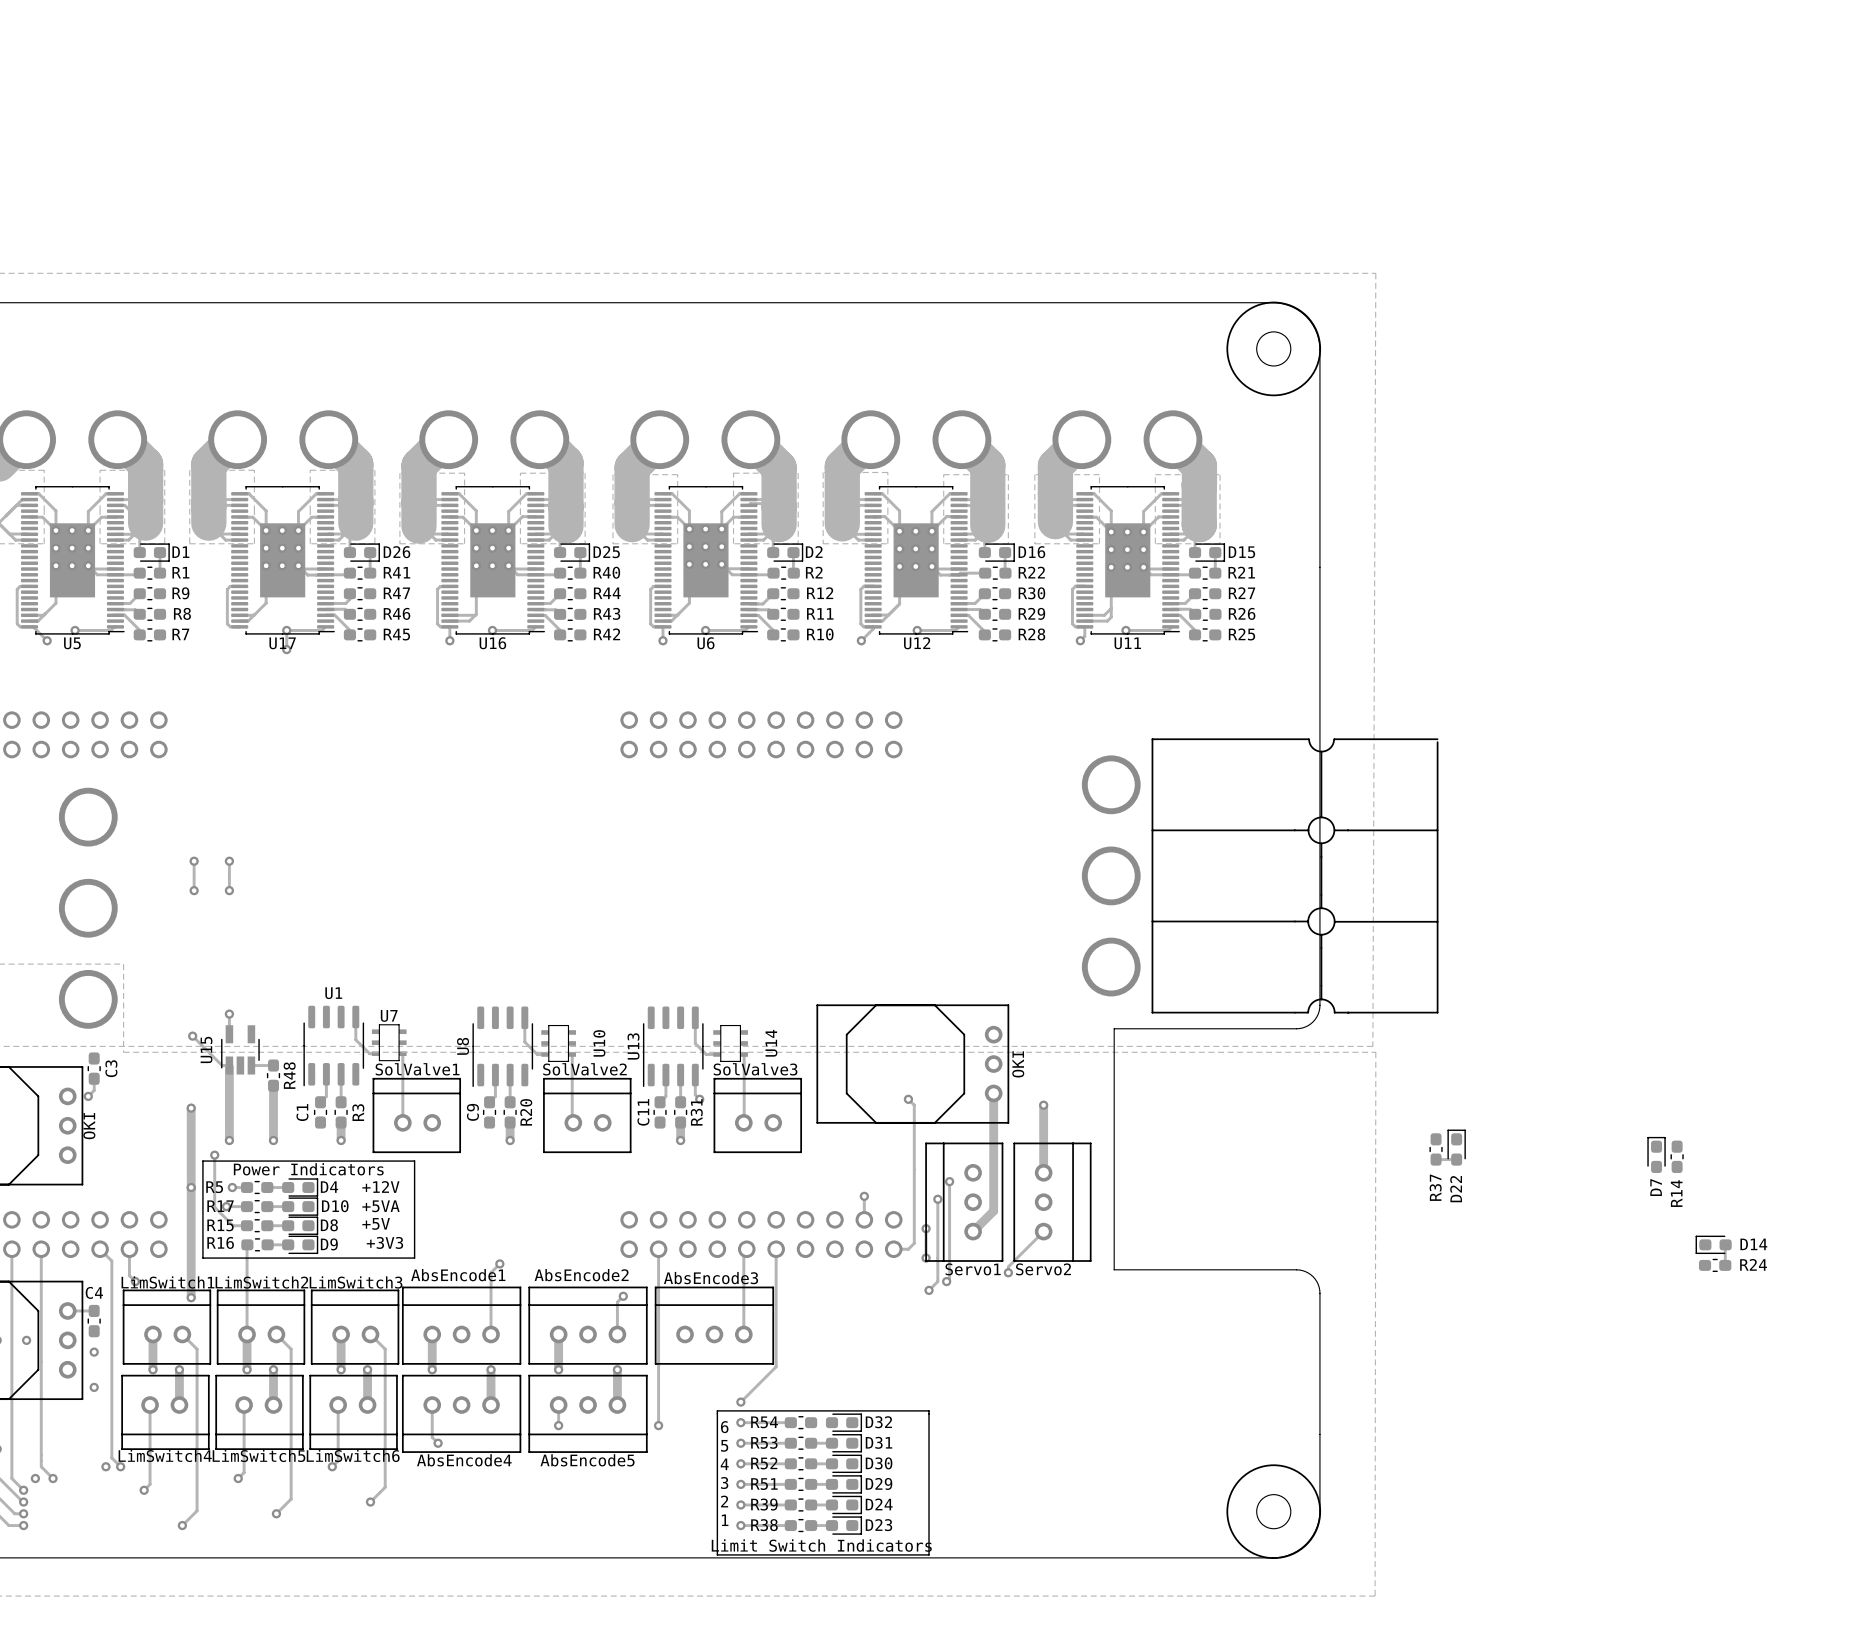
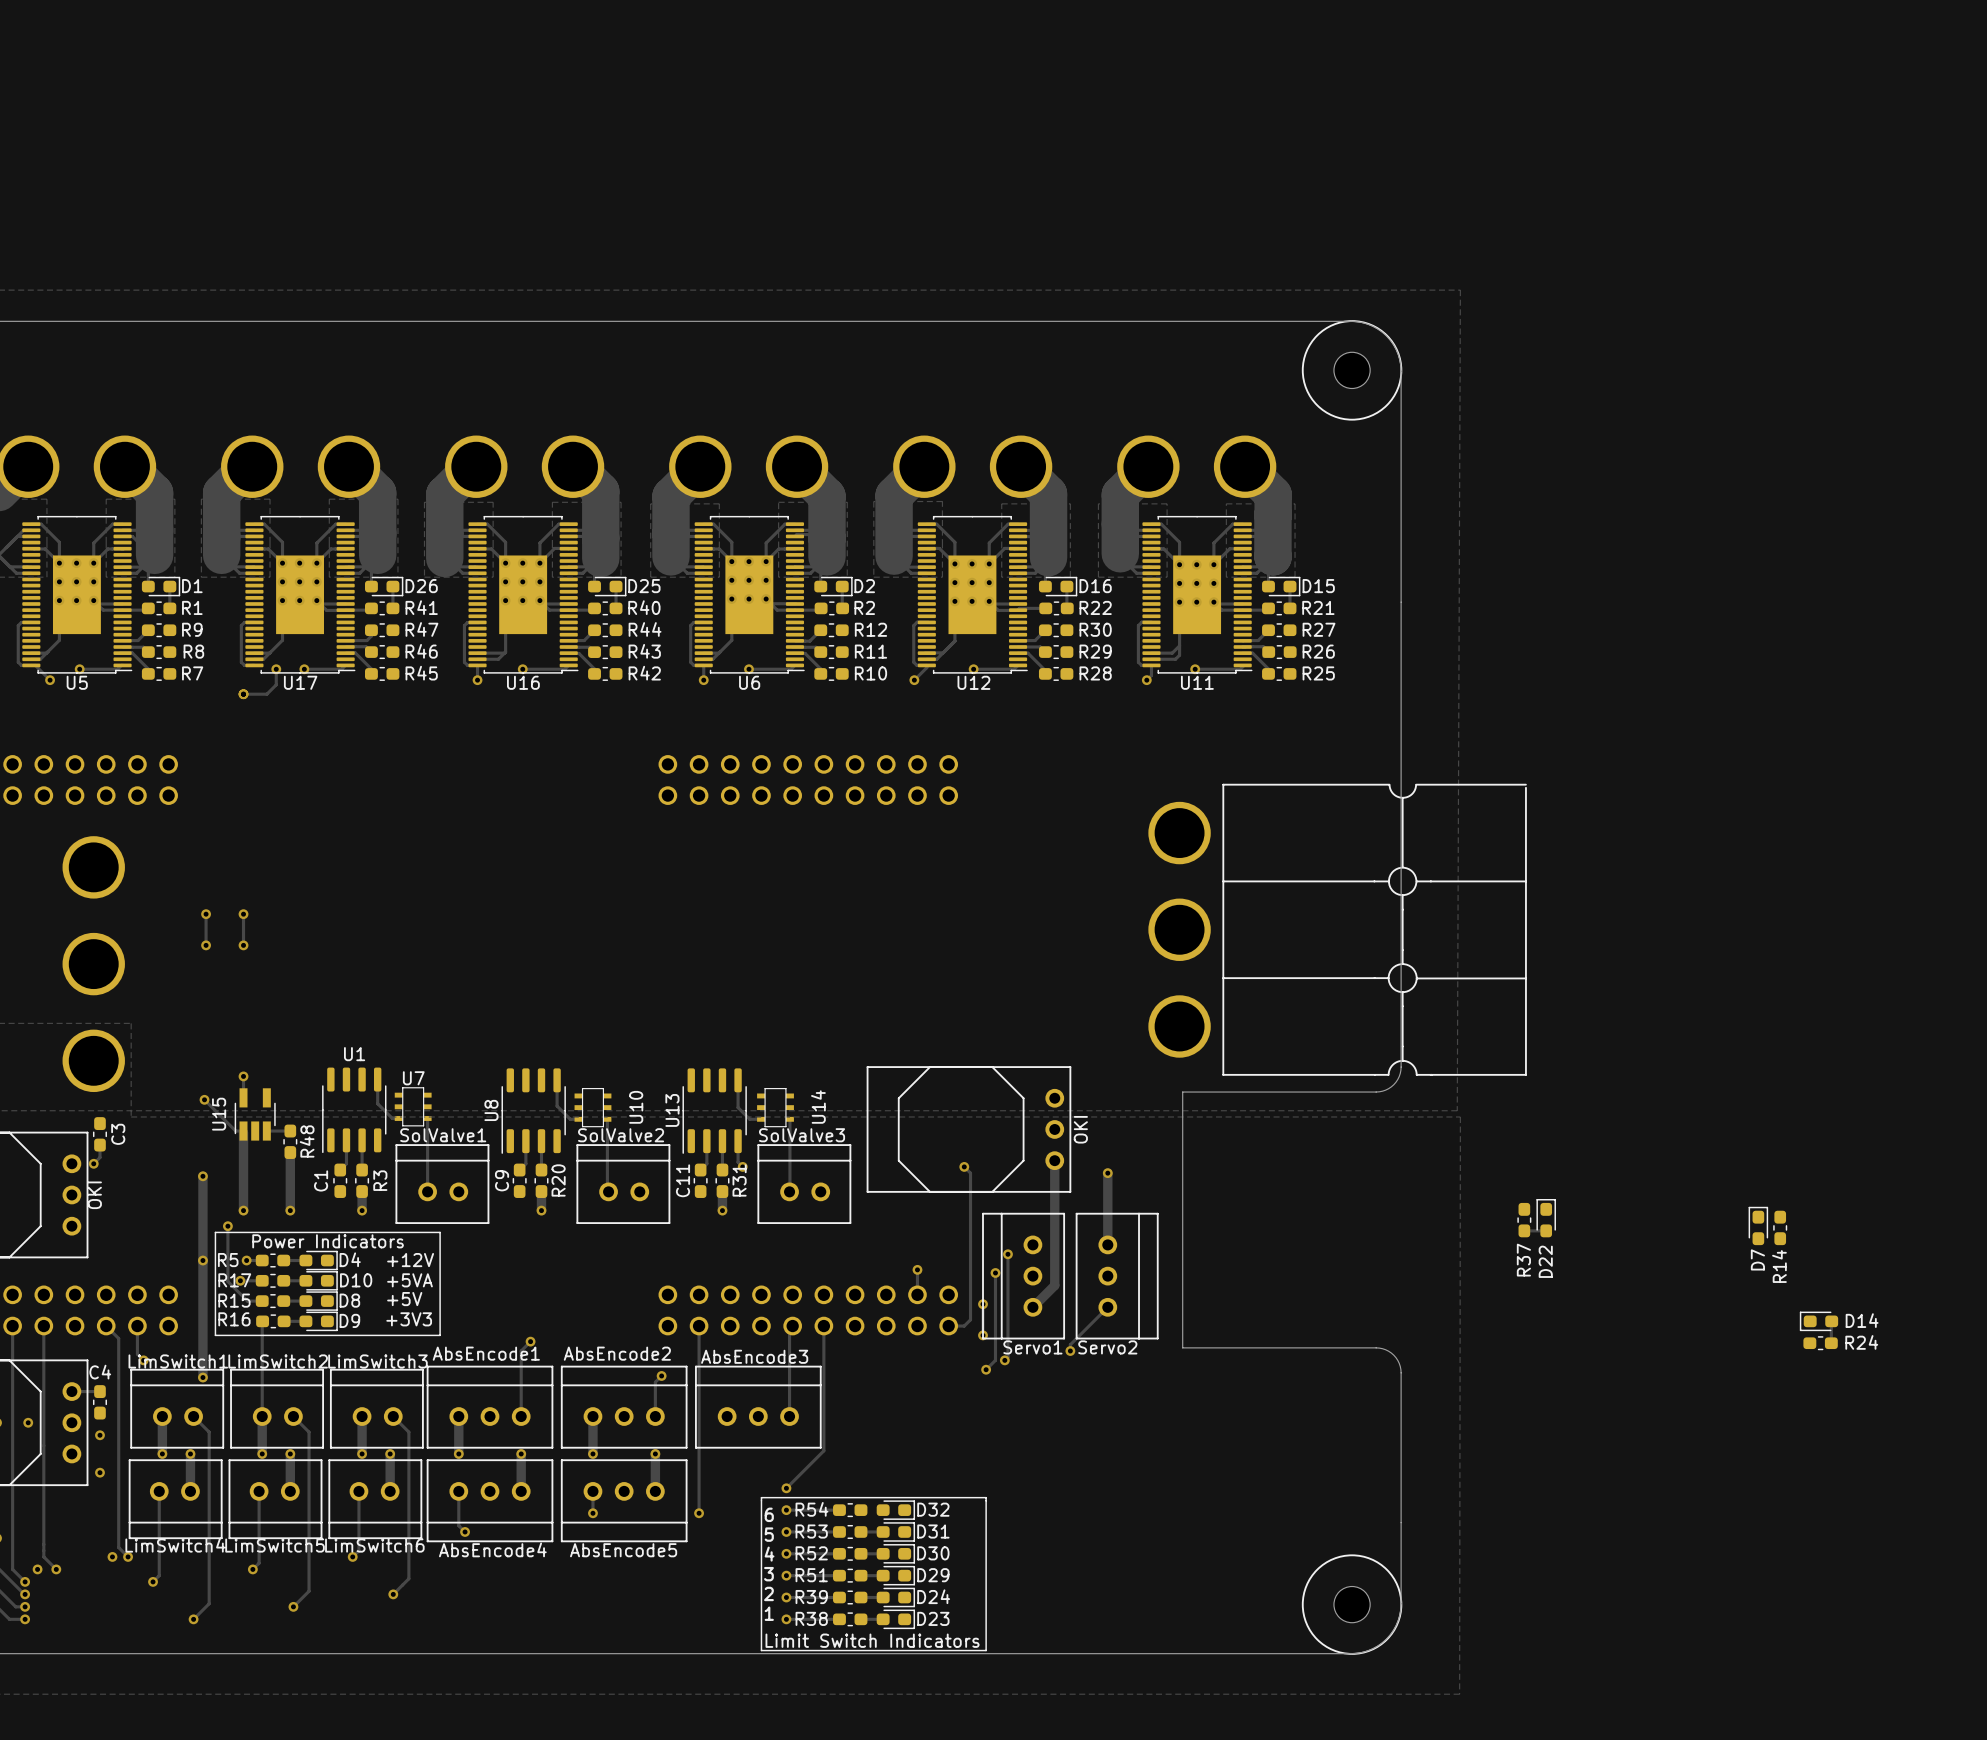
track: none -> (276, 669) (276, 684) (266, 694) (243, 694)
via: none -> (276, 669)
track: (285, 631) (286, 630) (286, 649) -> none
via: (286, 649) -> none
via: none -> (243, 694)

